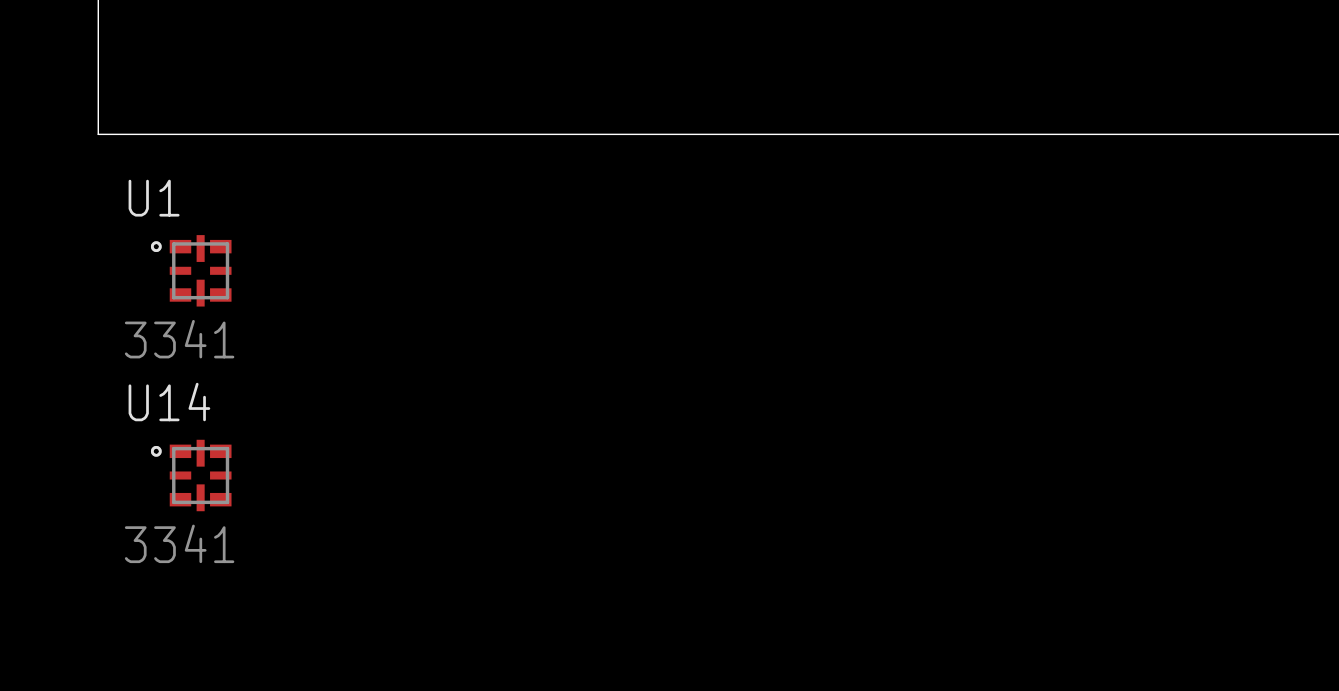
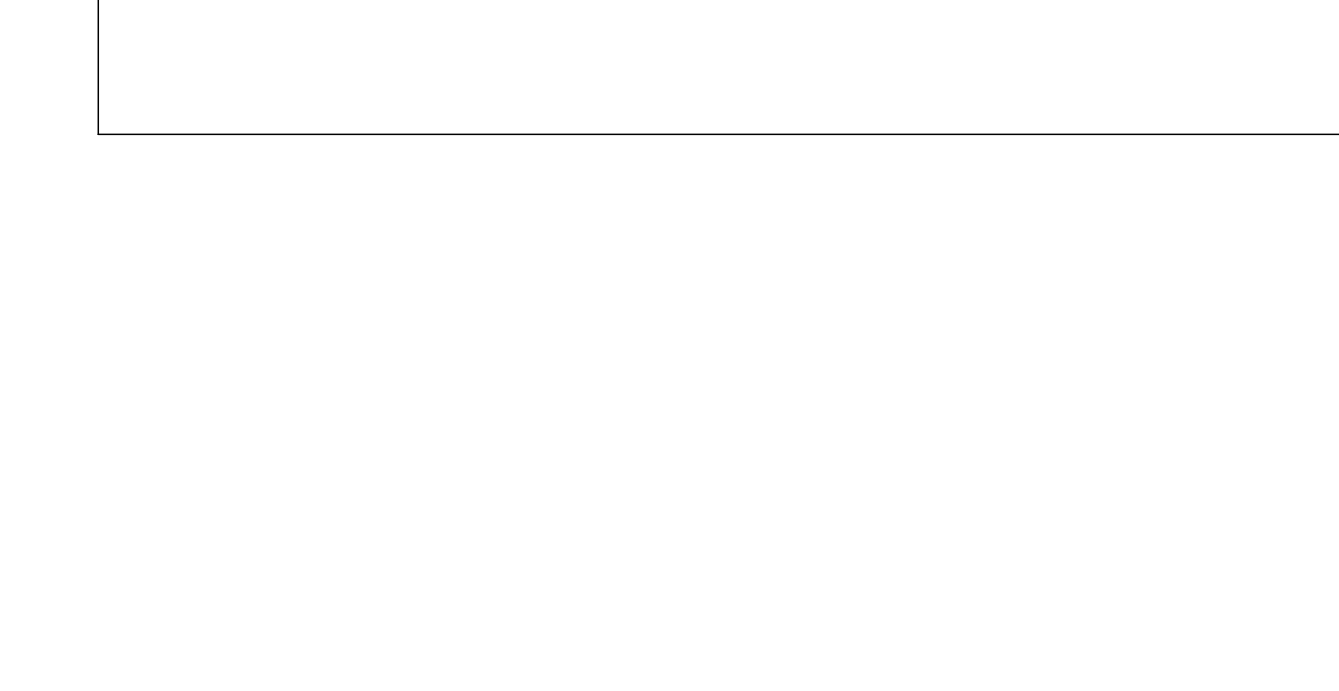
U1: 3341 (191, 270) -> none
U14: 3341 (191, 475) -> none

